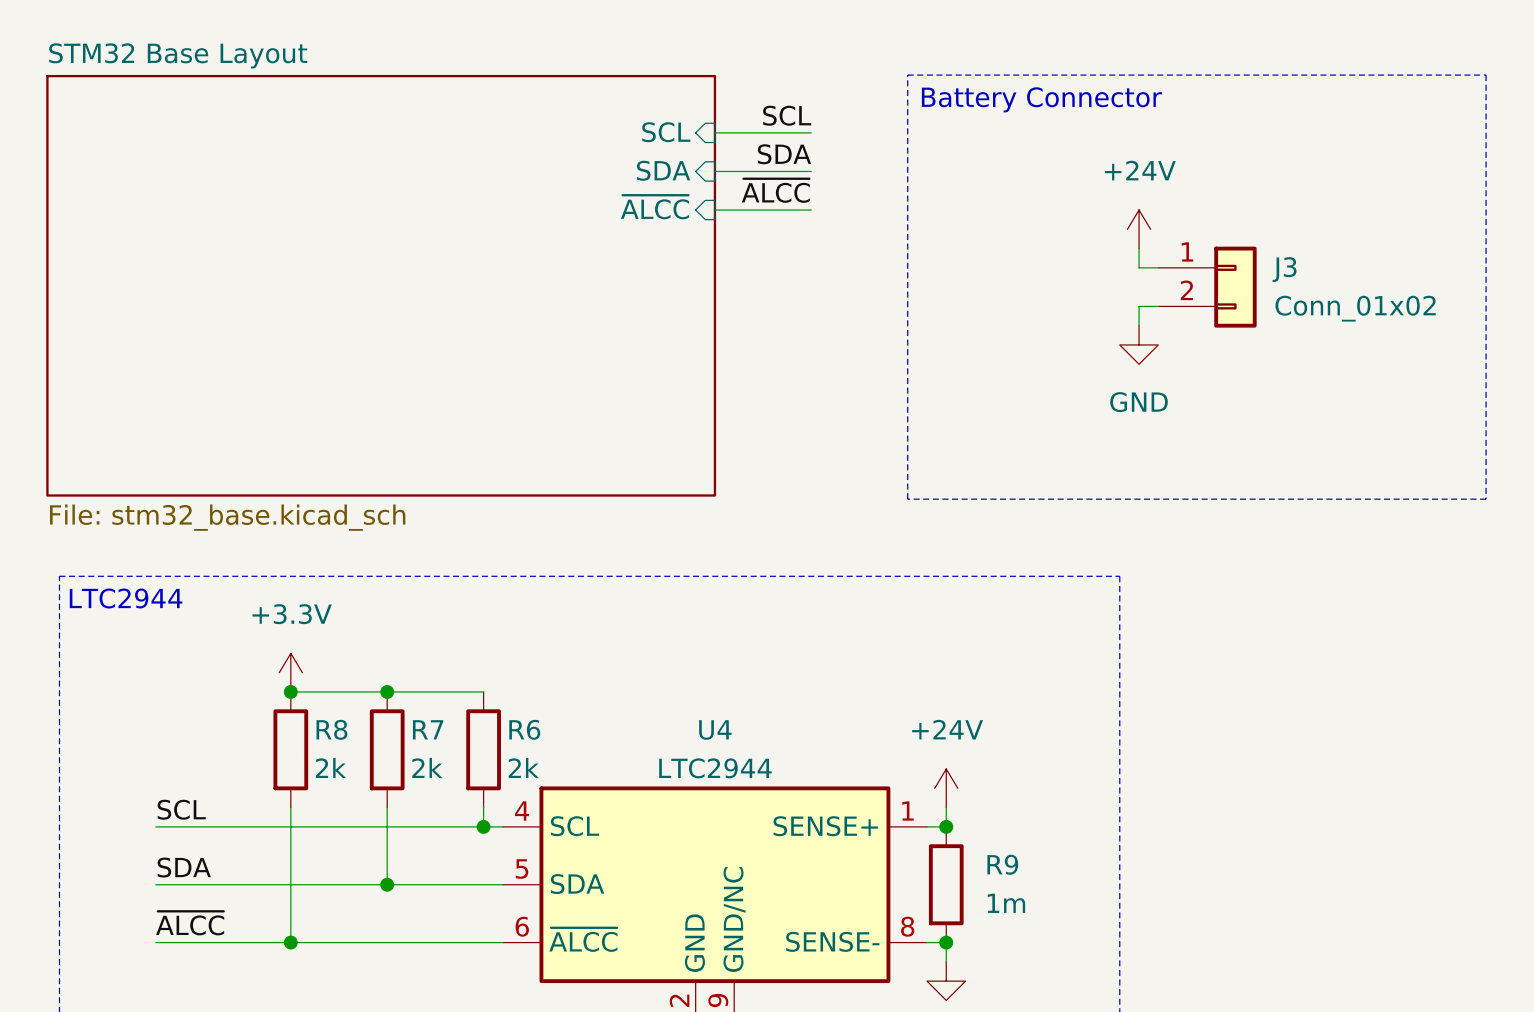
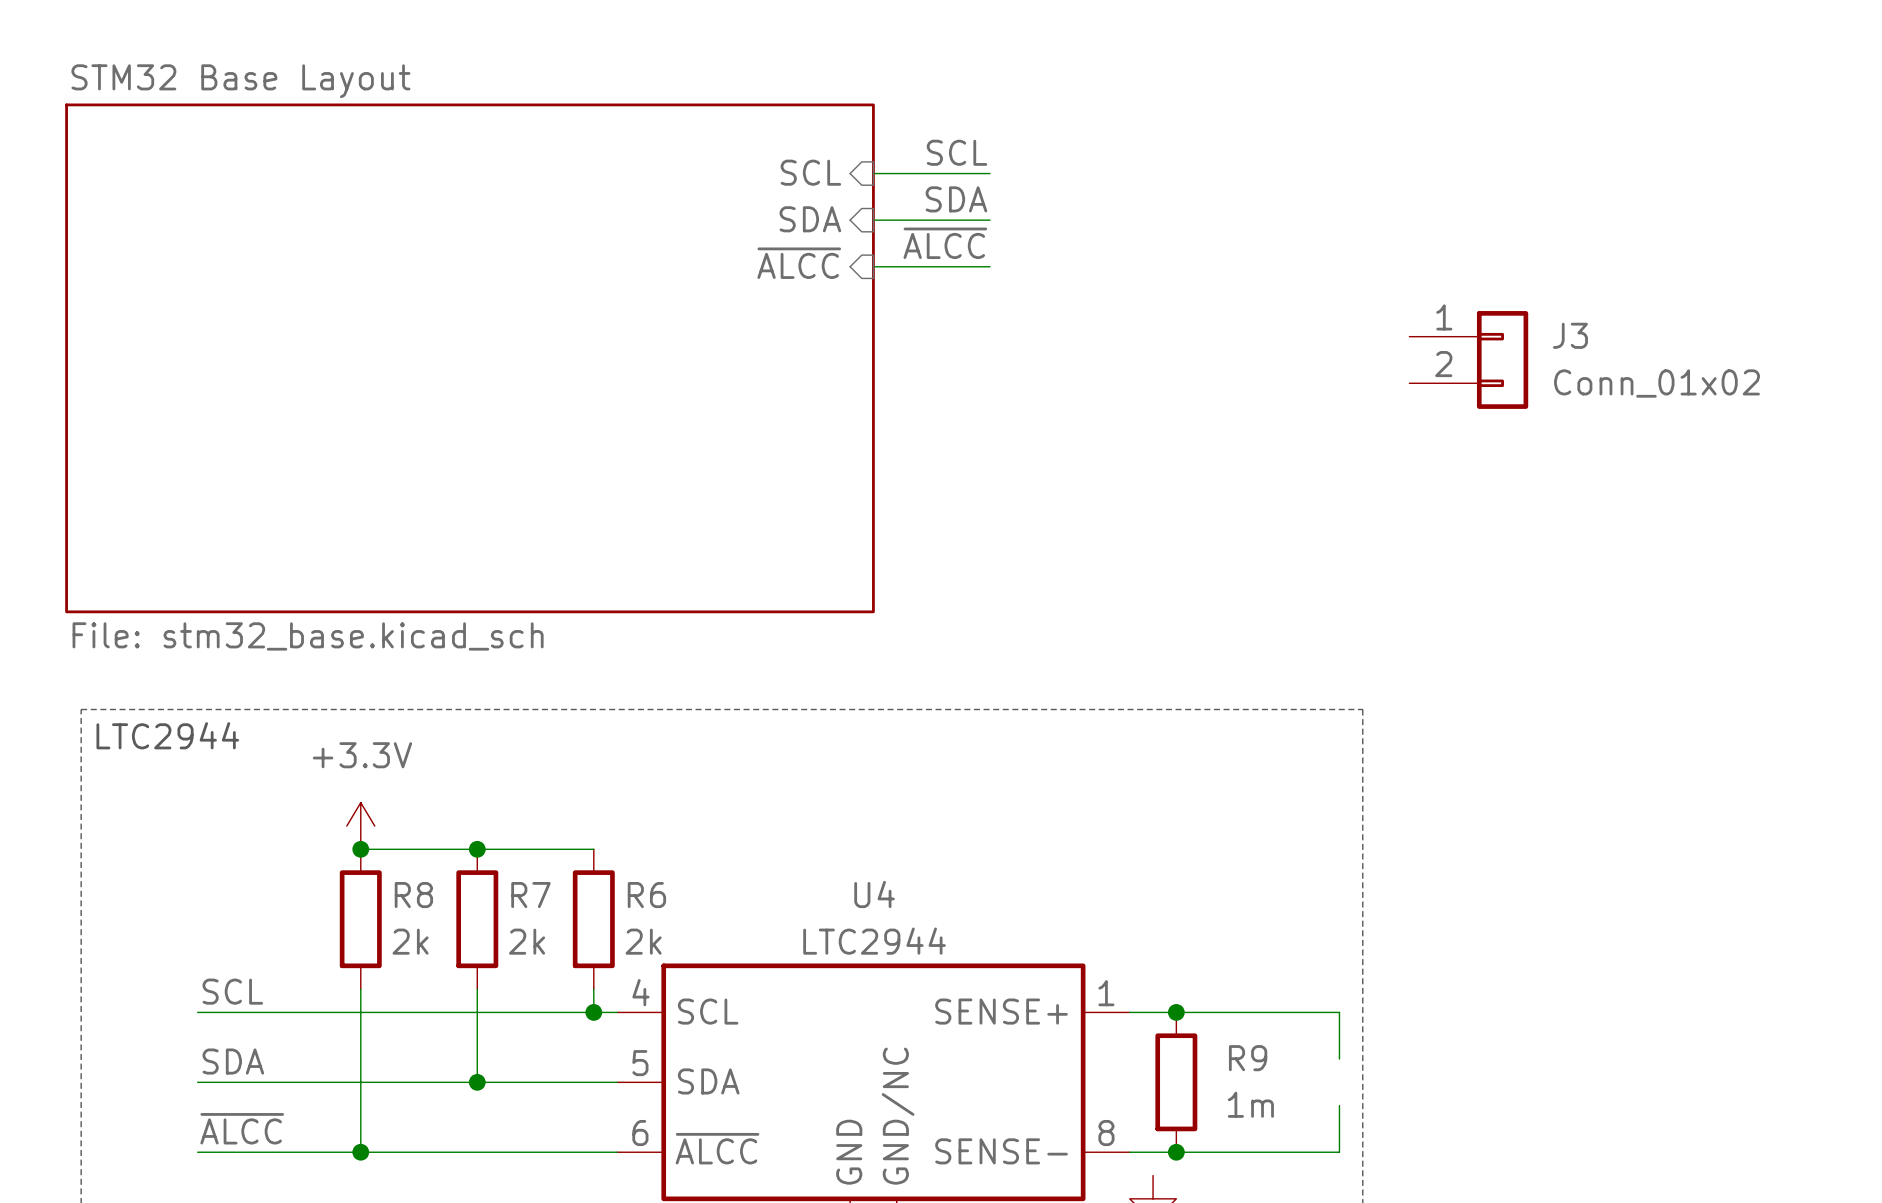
line: (907, 75) (1486, 75) (1486, 499) (907, 499) (907, 75) -> none
text: Battery Connector (1041, 99) -> none
power symbol: +24V (1139, 229) -> none
wire: (1139, 248) (1139, 267) (1158, 267) -> none
wire: (1158, 306) (1139, 306) (1139, 325) -> none
power symbol: GND (1139, 344) -> none
power symbol: +24V (946, 788) -> none
wire: (946, 807) (946, 826) -> (1339, 1059) (1339, 1012) (1153, 1012)
junction position: (946, 826) -> (1176, 1012)
R9 position: (946, 884) -> (1176, 1082)
wire: (946, 942) (946, 961) -> (1153, 1152) (1339, 1152) (1339, 1105)
junction position: (946, 942) -> (1176, 1152)

